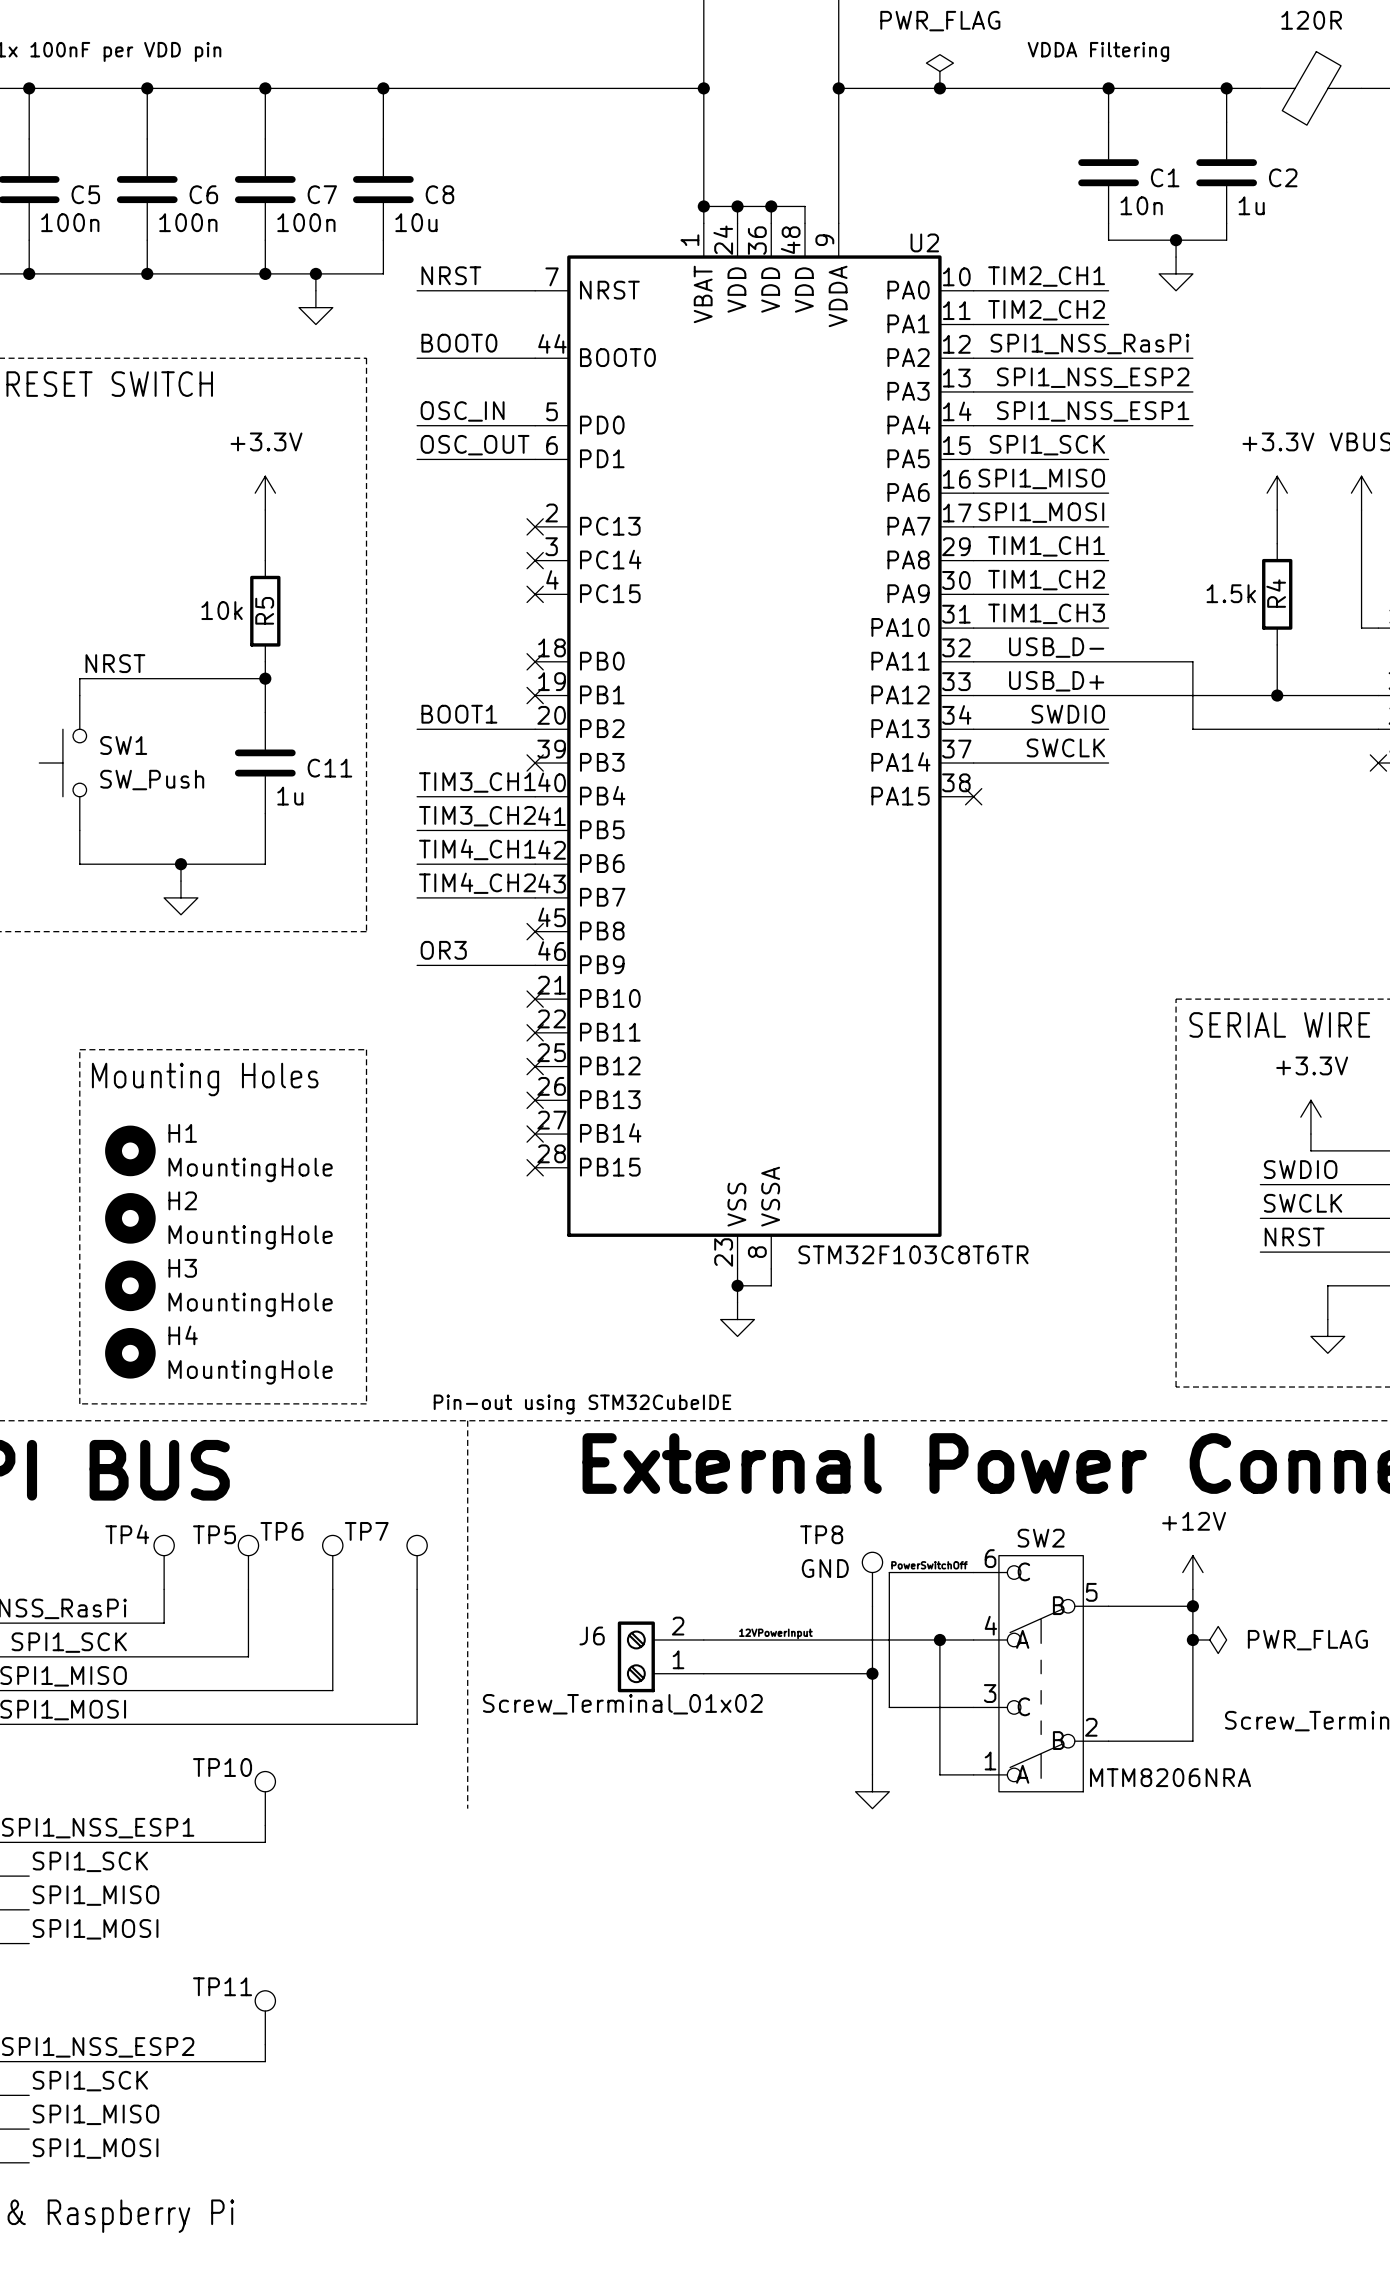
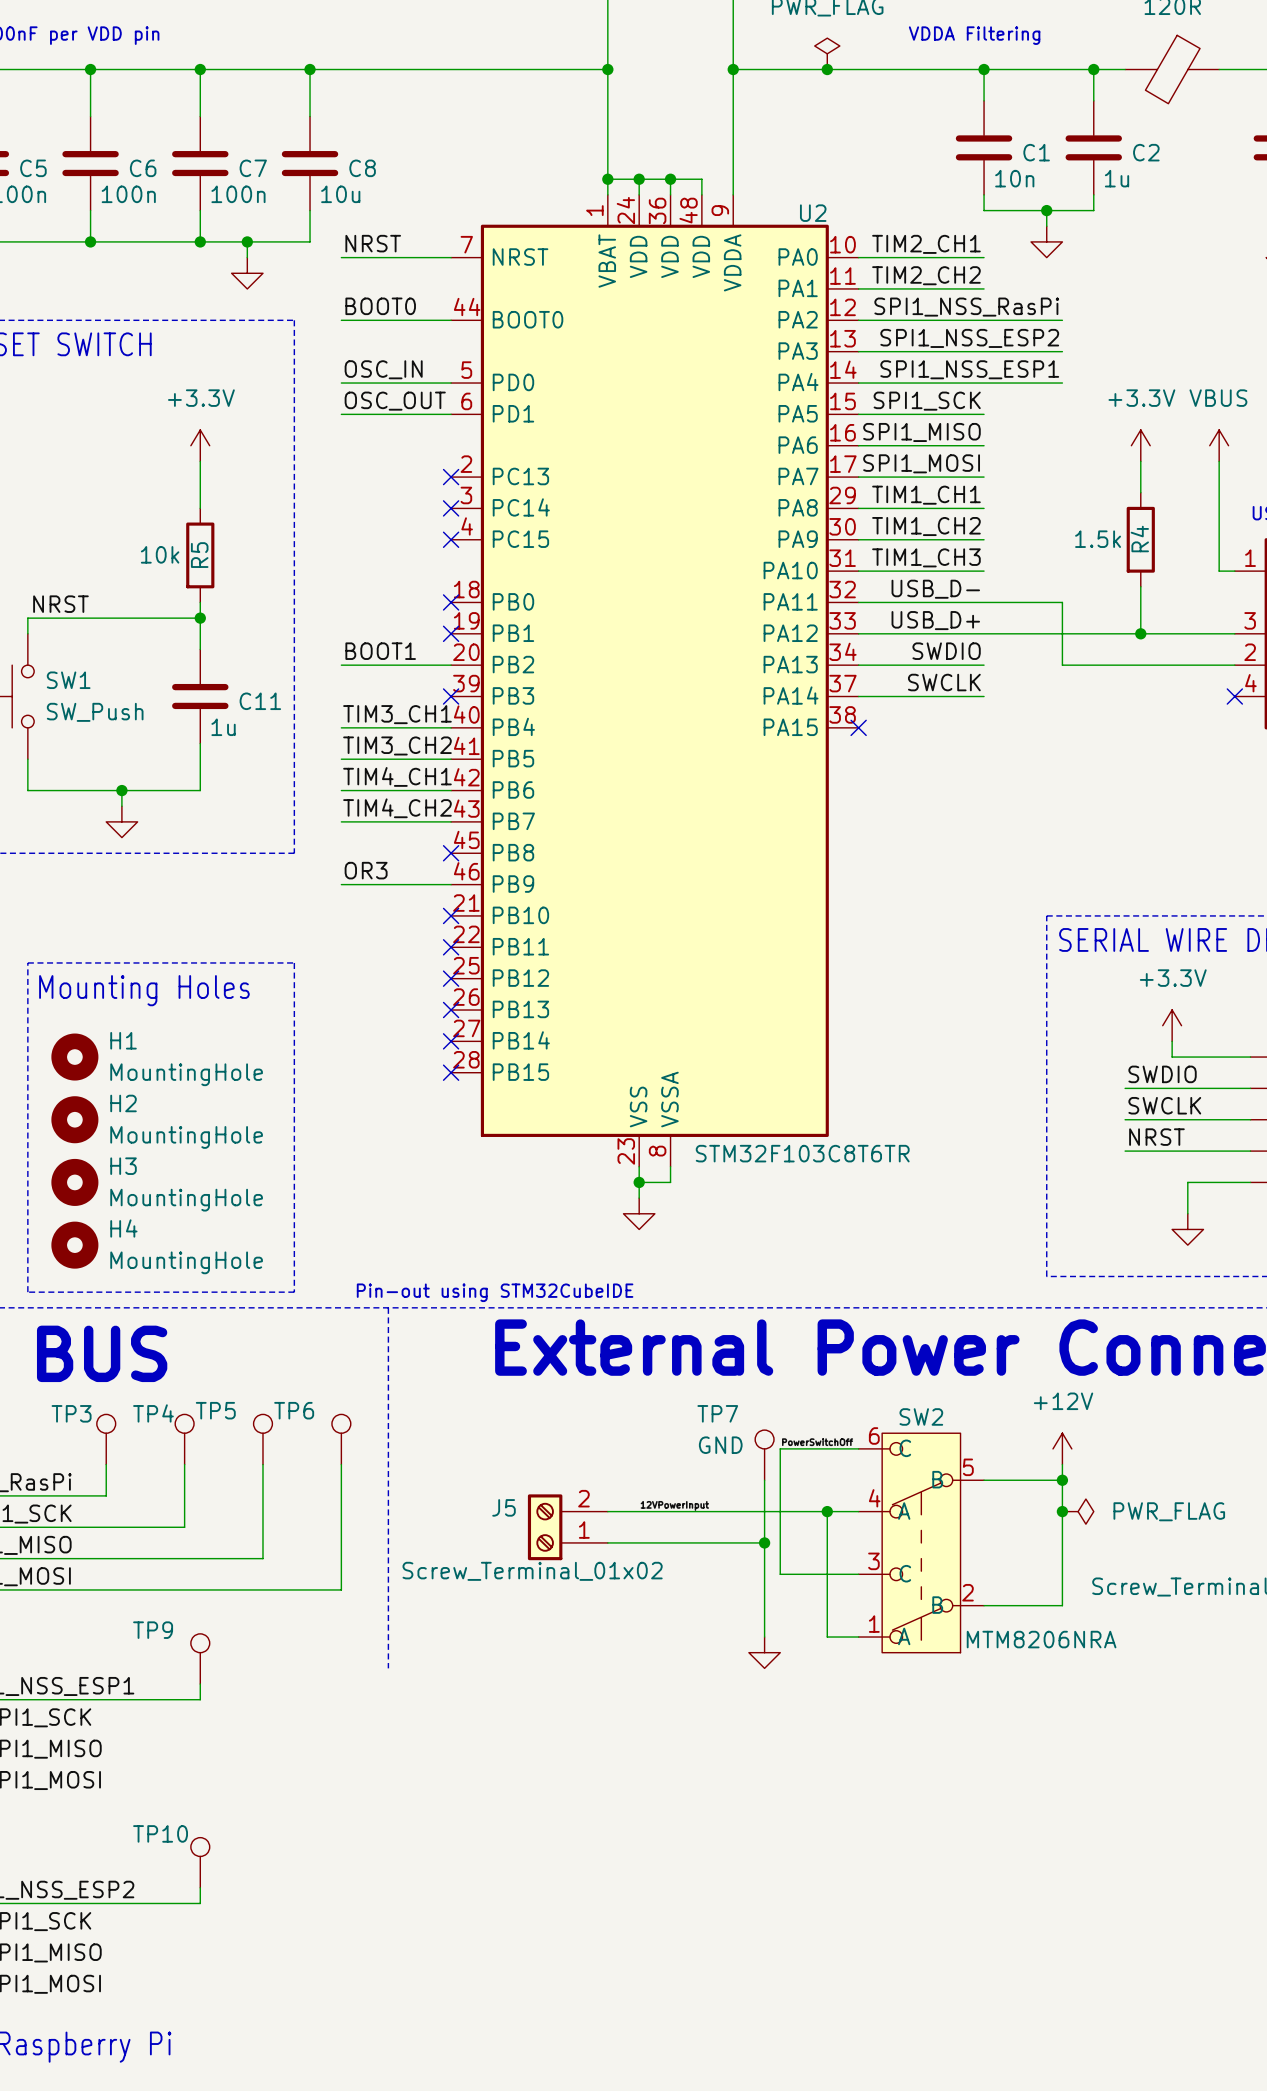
TP6 name: TP6 (281, 1531) -> TP5 (215, 1410)
TP7 name: TP7 (366, 1531) -> TP6 (294, 1410)
TP4 name: TP4 (127, 1534) -> TP3 (71, 1413)
TP5 name: TP5 (214, 1534) -> TP4 (153, 1413)
TP8 name: TP8 (821, 1534) -> TP7 (717, 1413)
J6 name: J6 (592, 1635) -> J5 (504, 1507)
TP10 name: TP10 (222, 1767) -> TP9 (153, 1630)
TP11 name: TP11 (222, 1986) -> TP10 (160, 1833)

